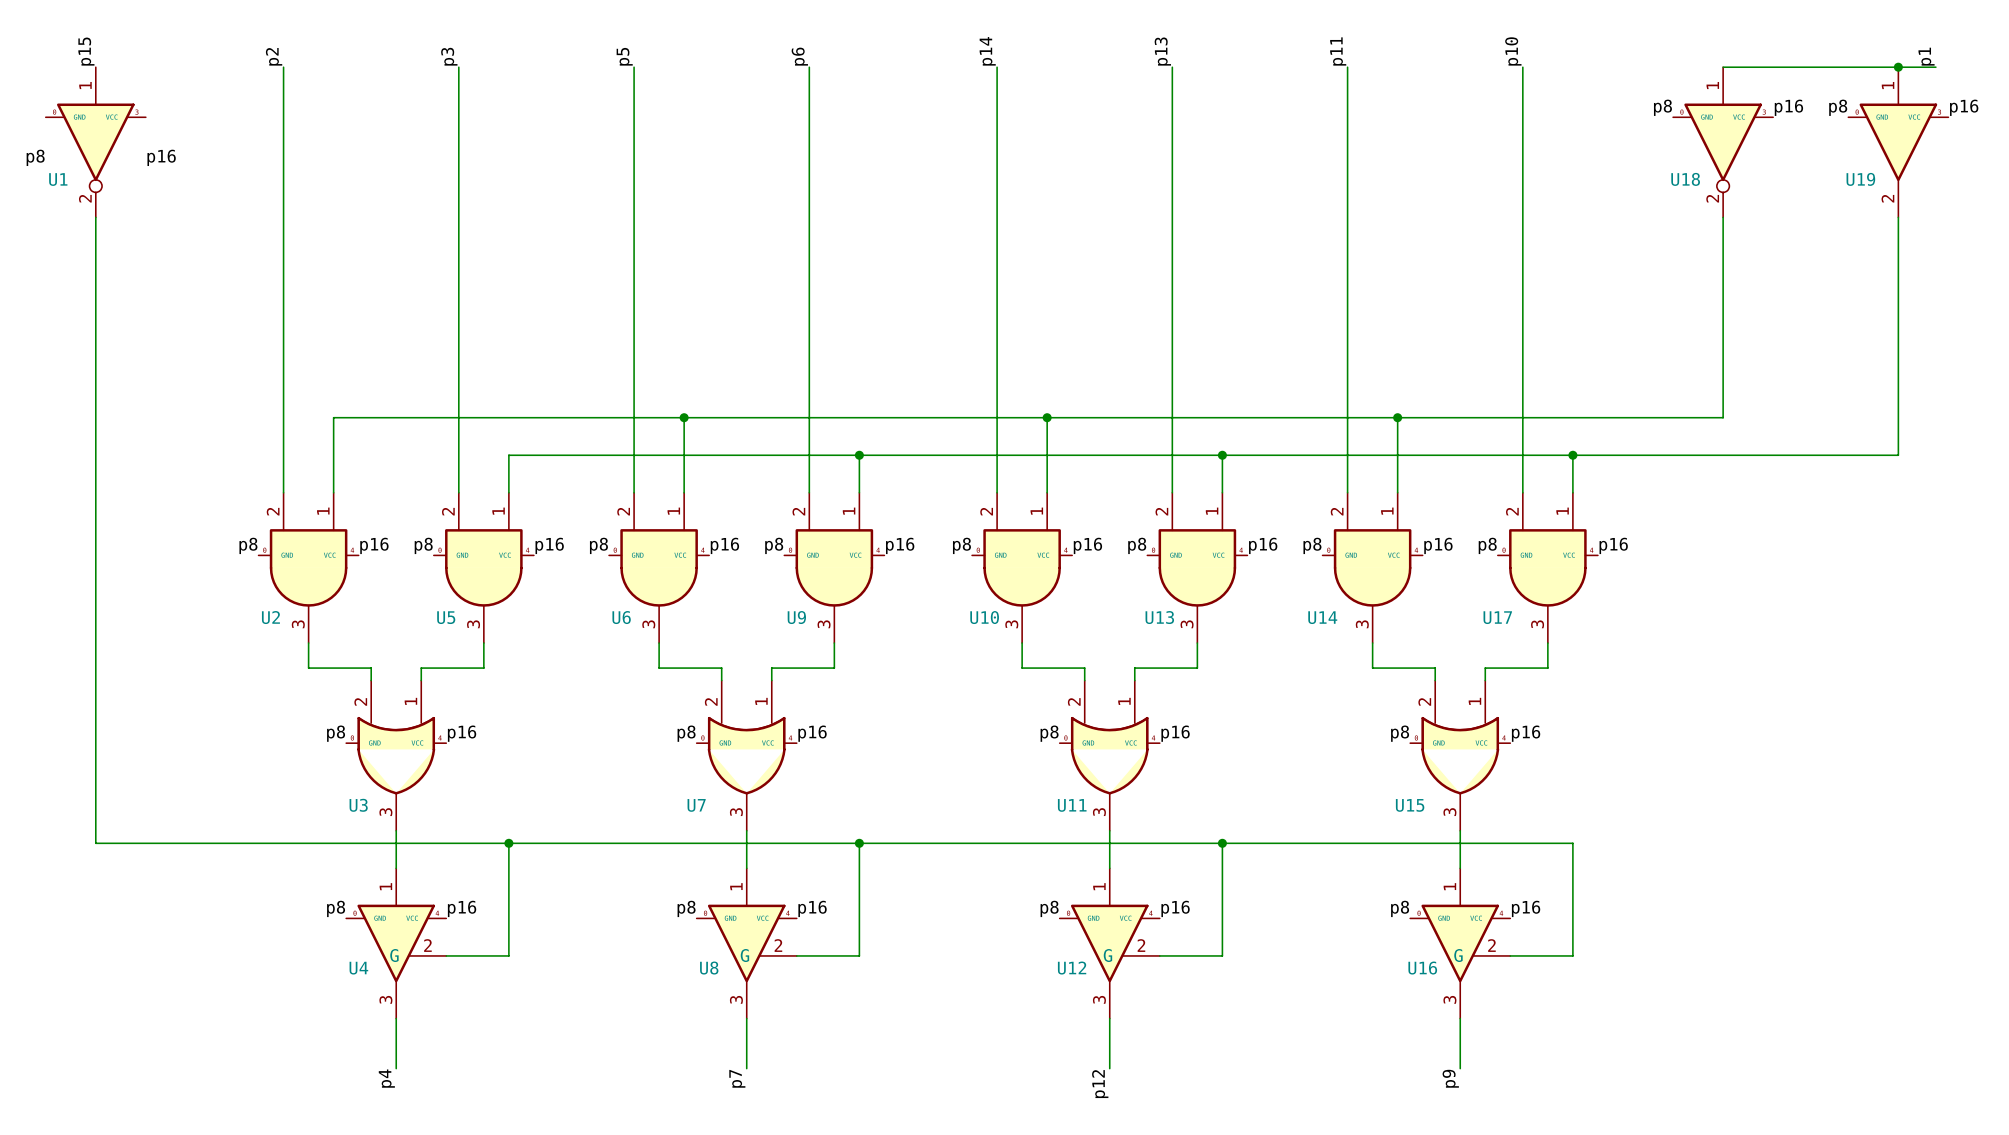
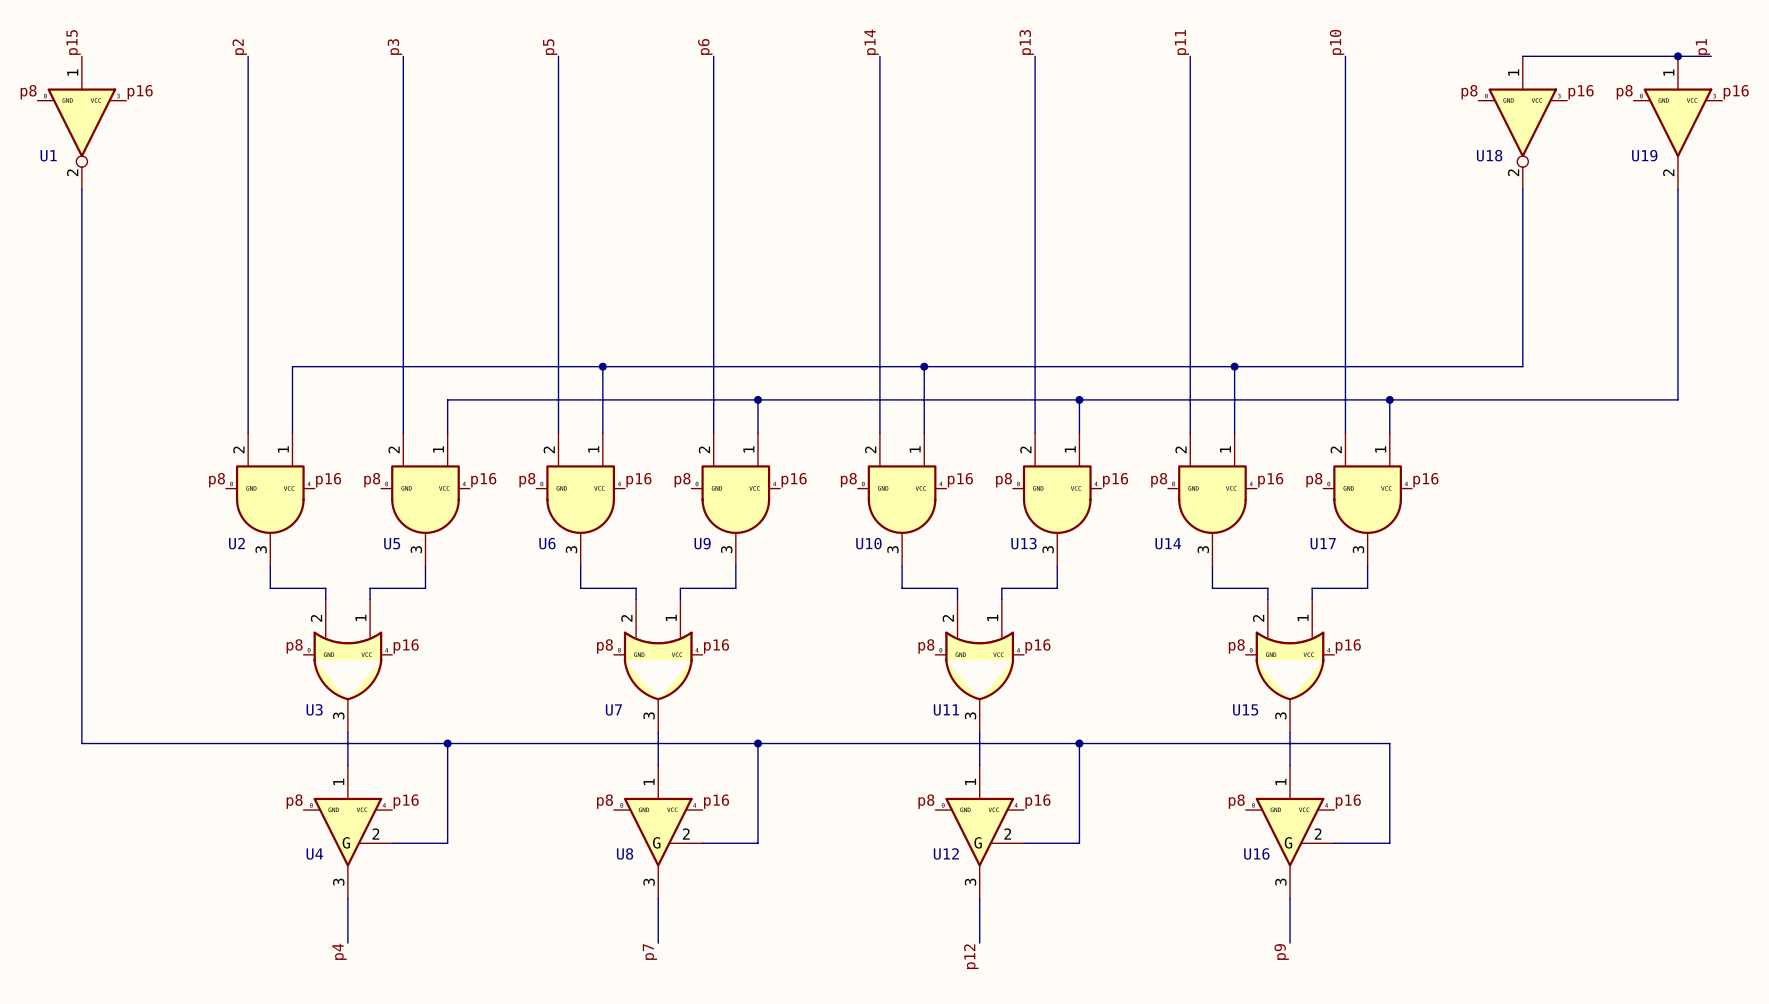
label position: p8 (35, 157) -> p8 (28, 92)
label position: p16 (161, 157) -> p16 (140, 92)

